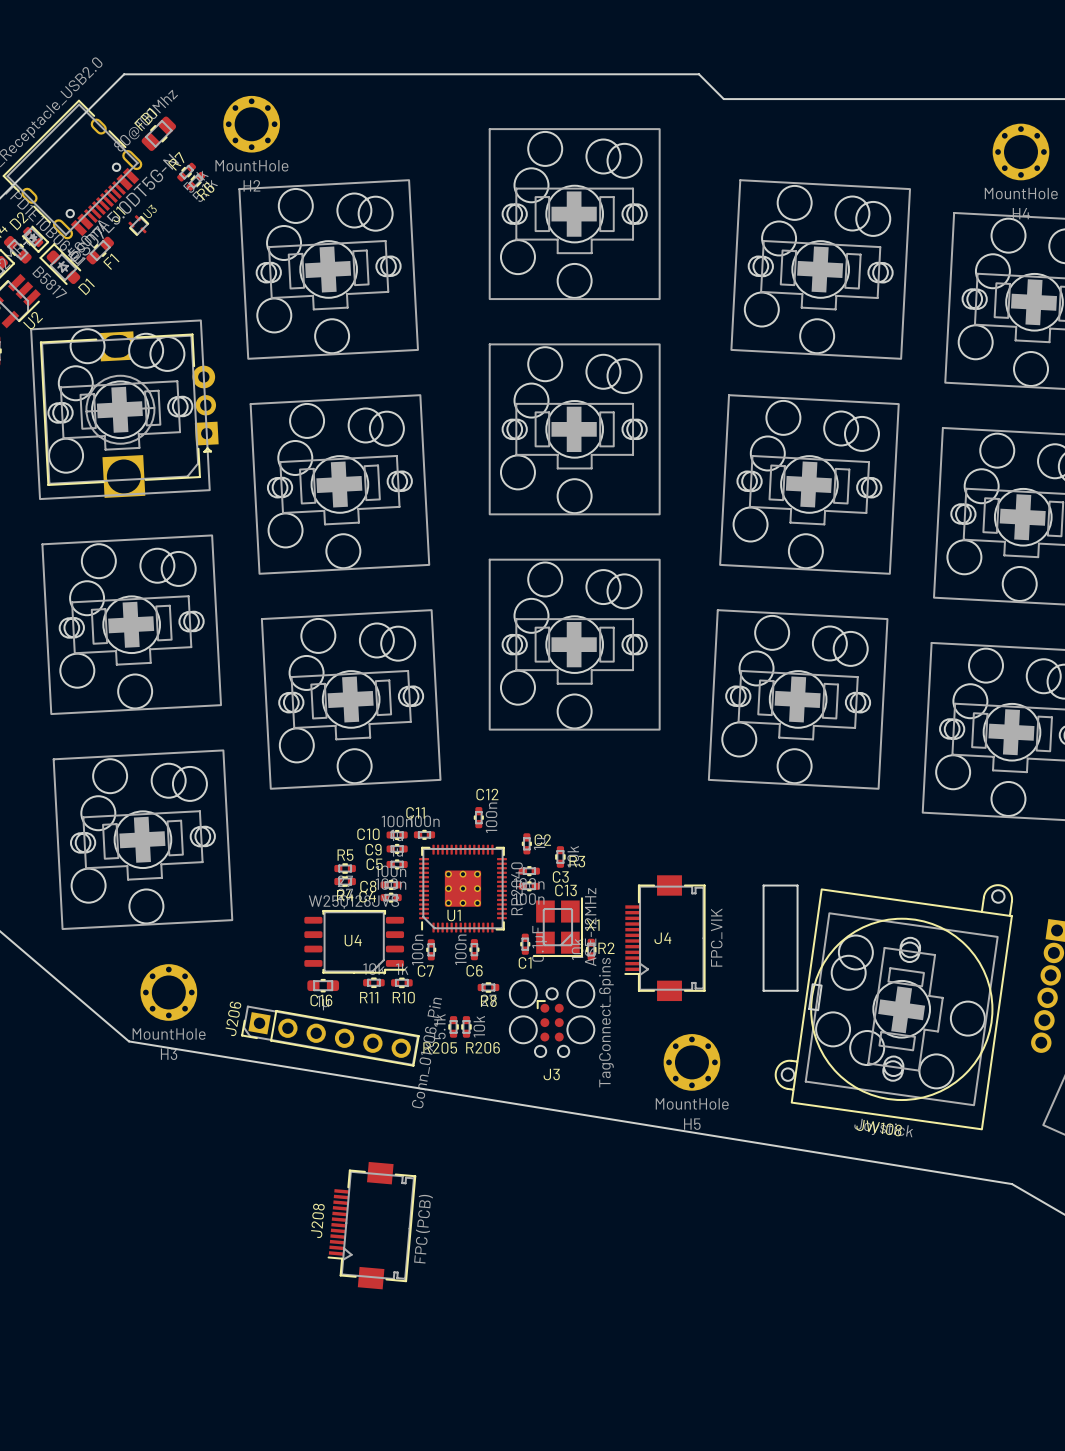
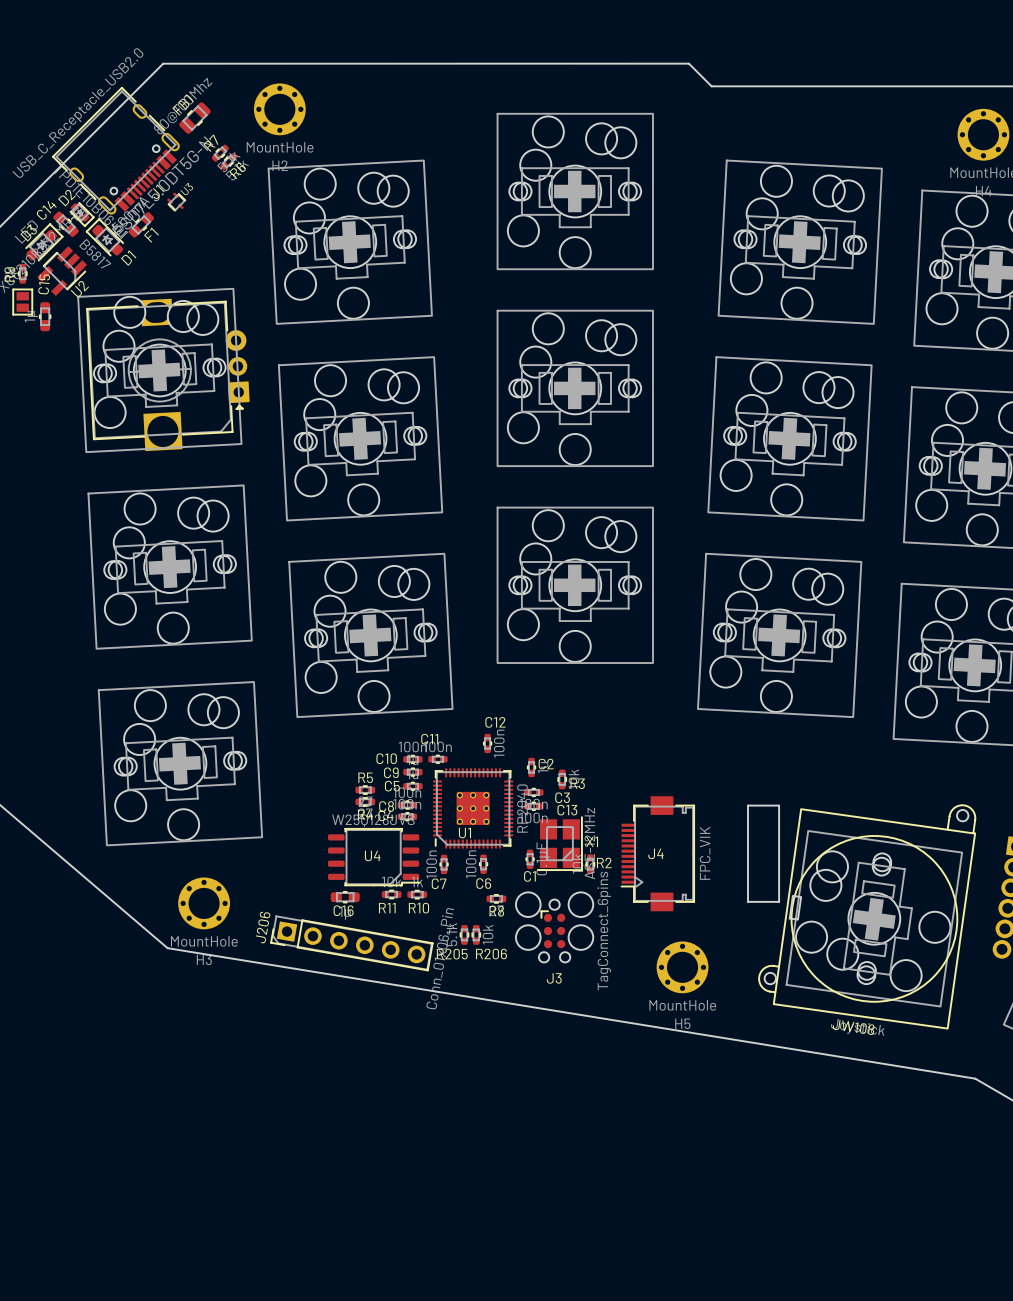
J208: FPC (PCB) (371, 1225) -> none

